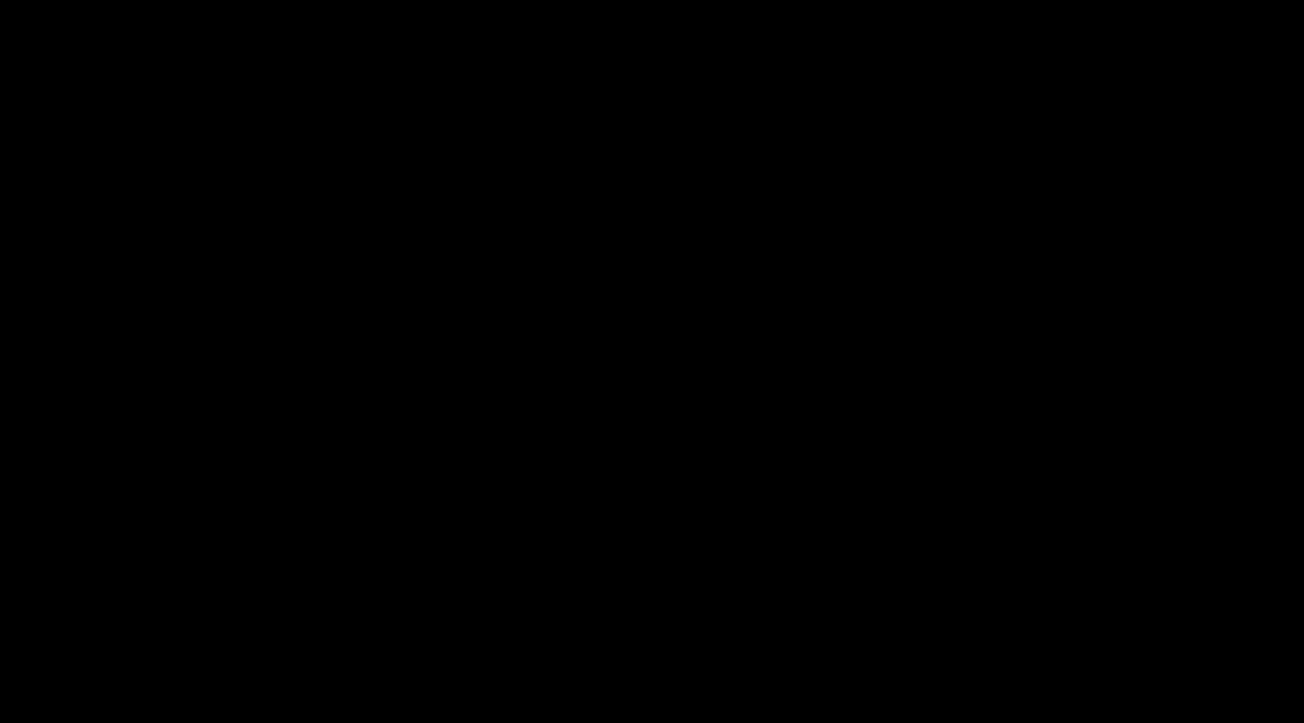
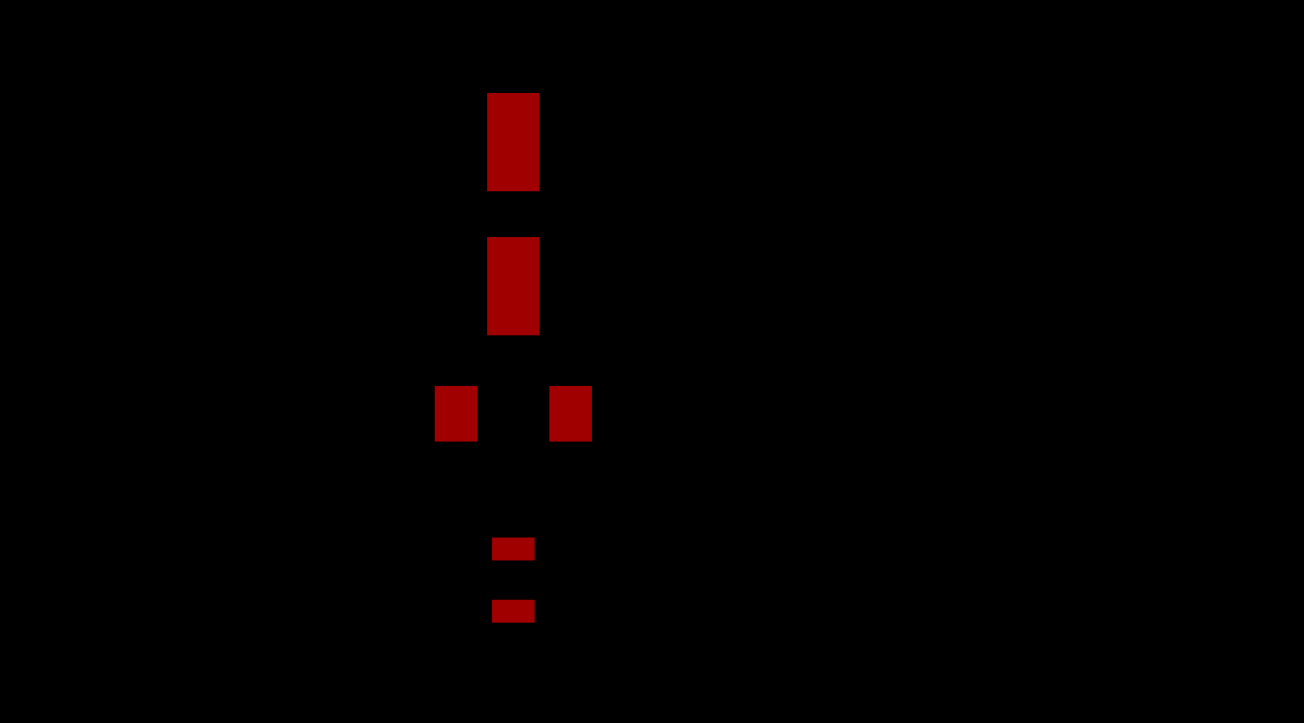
part: none -> (513, 214)
part: none -> (513, 413)
part: none -> (513, 580)

